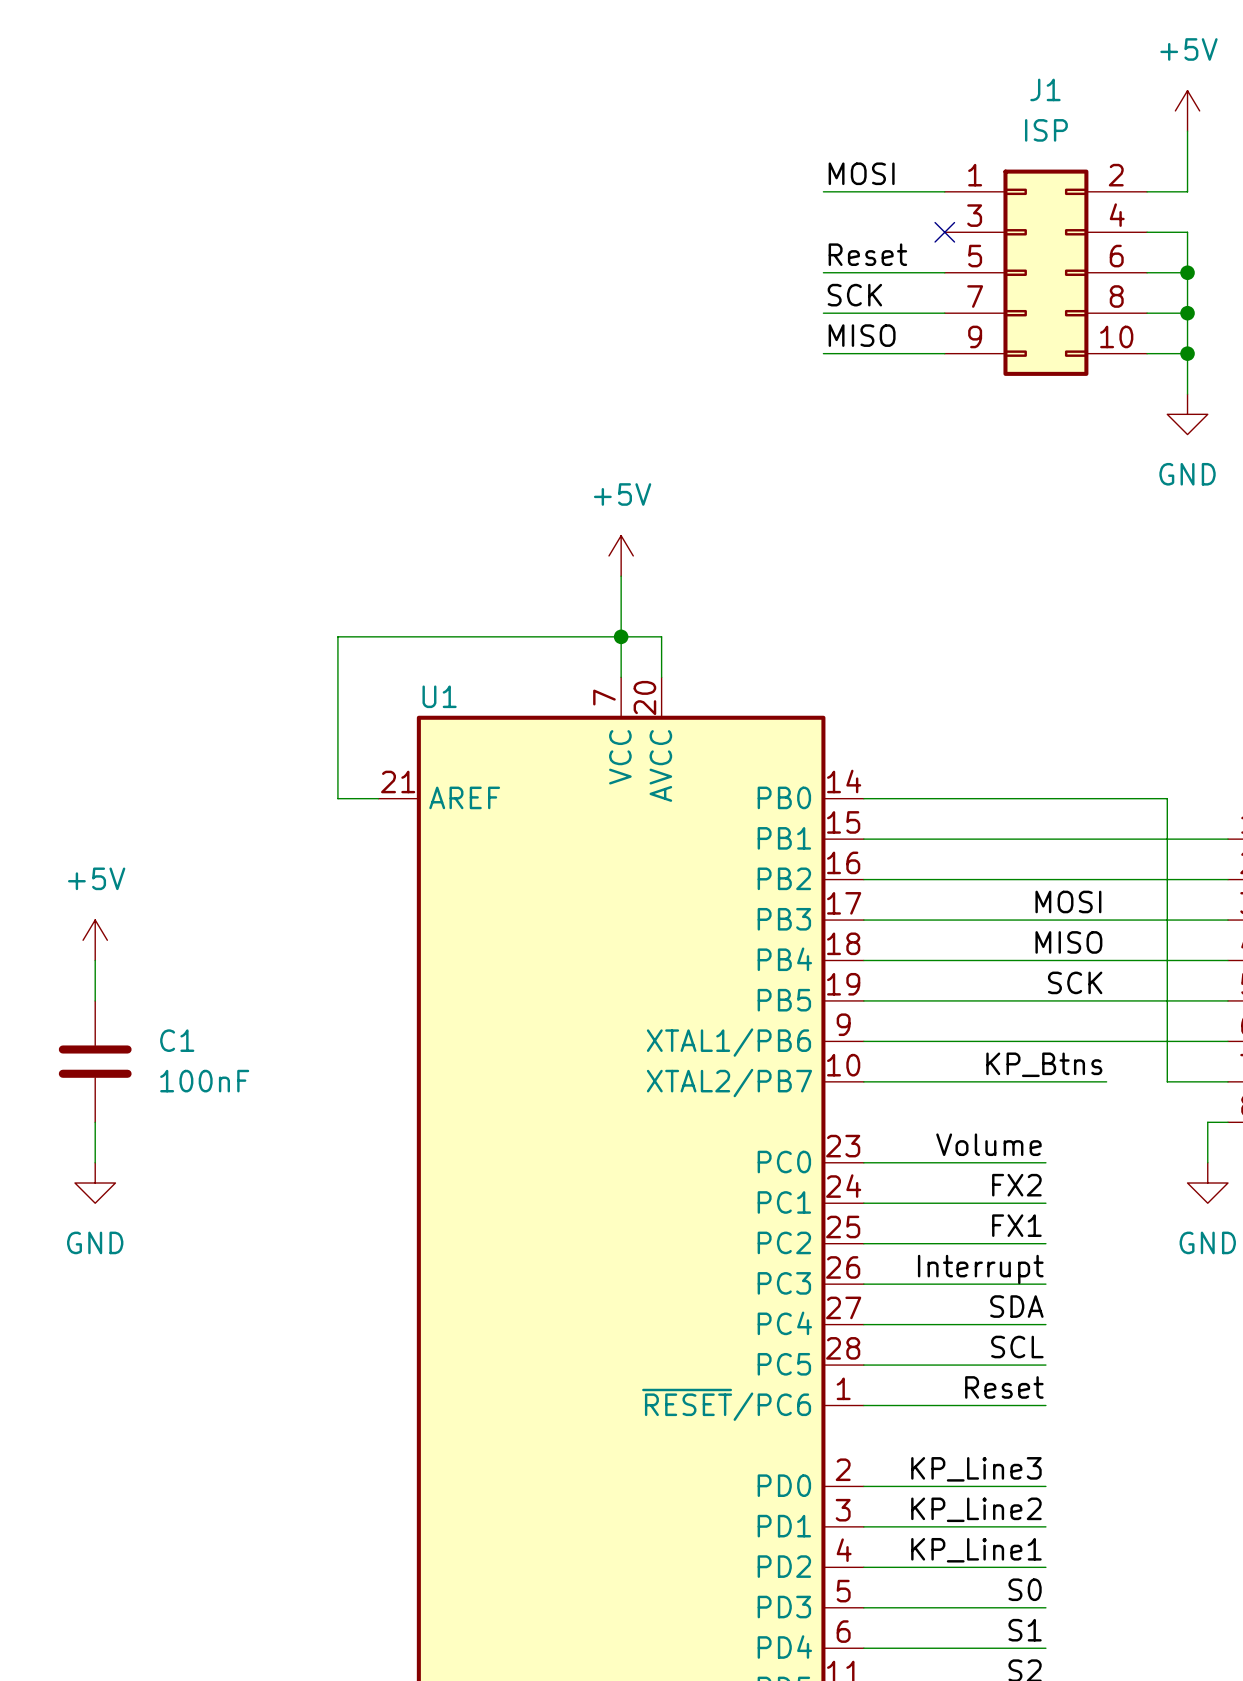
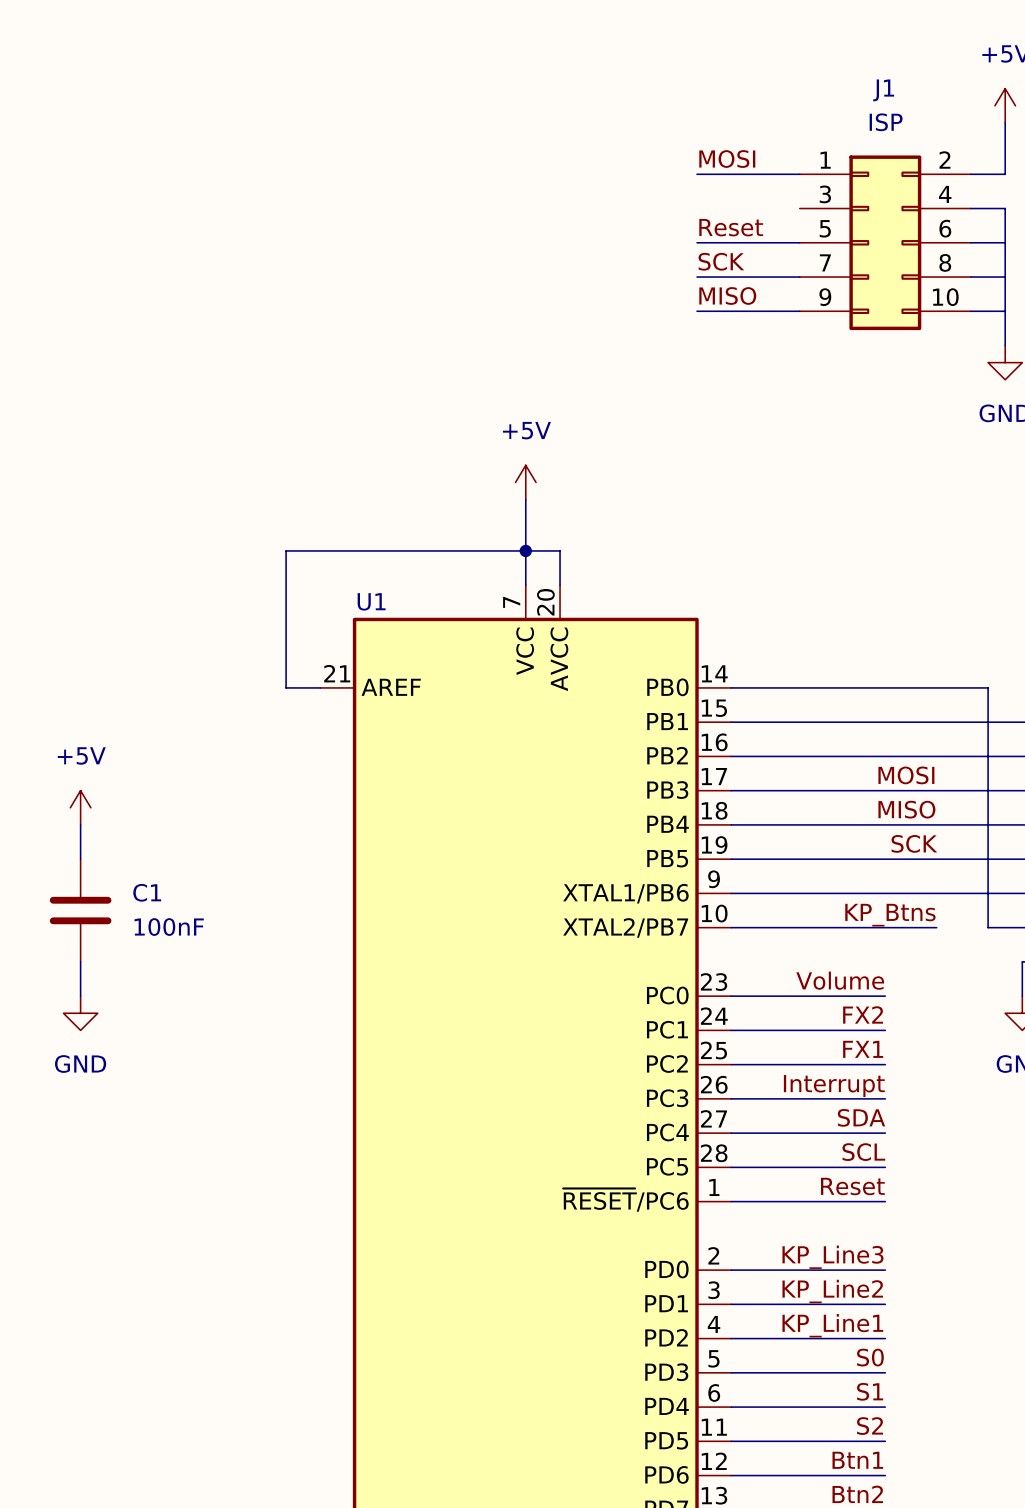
no-connect mark: (944, 232) -> none
junction: (1187, 272) -> none
junction: (1187, 313) -> none
junction: (1187, 353) -> none

